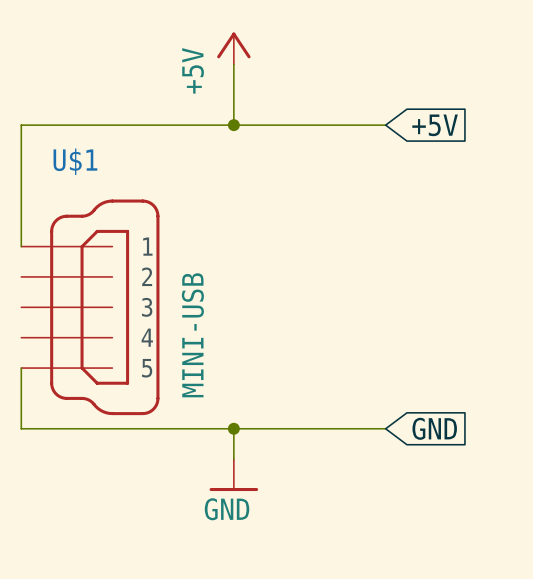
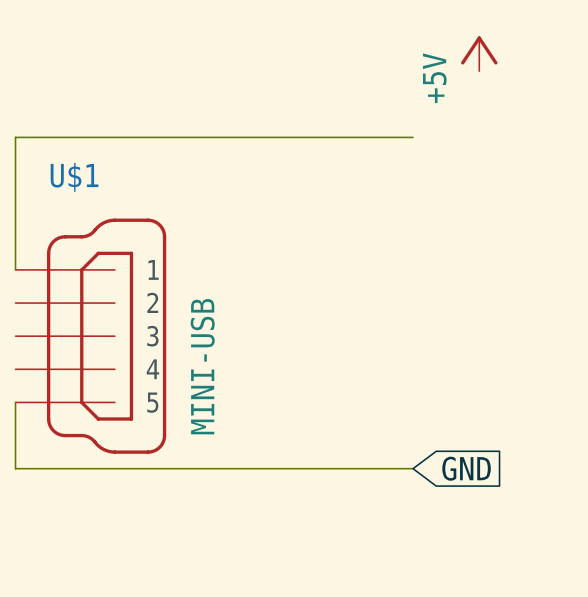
power symbol position: +5V (233, 48) -> +5V (479, 53)
wire: (233, 64) (233, 125) -> none
junction: (233, 125) -> none
global label: +5V (435, 125) -> none
wire: (233, 428) (233, 459) -> none
junction: (233, 428) -> none
power symbol: GND (233, 475) -> none

